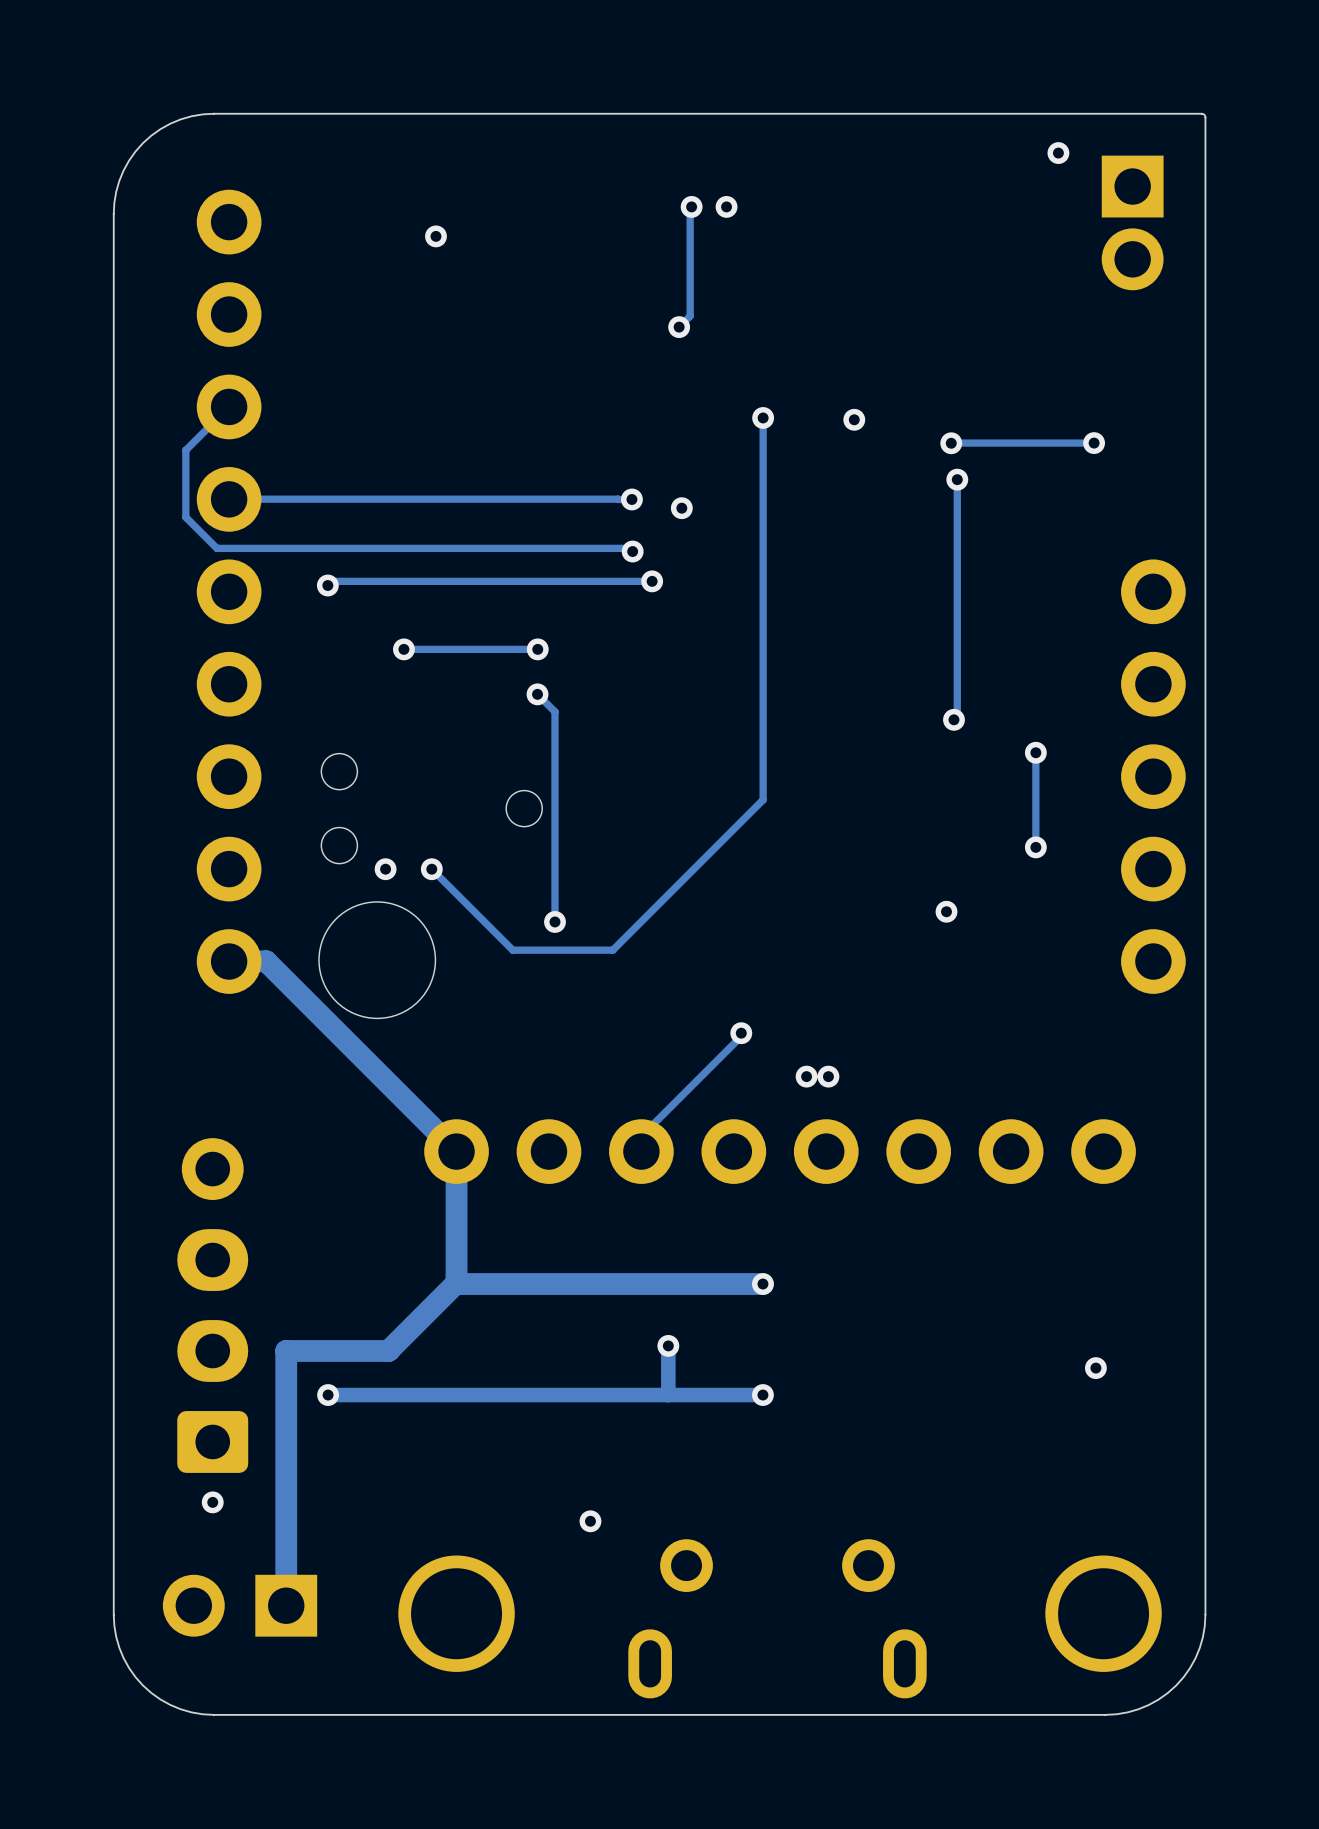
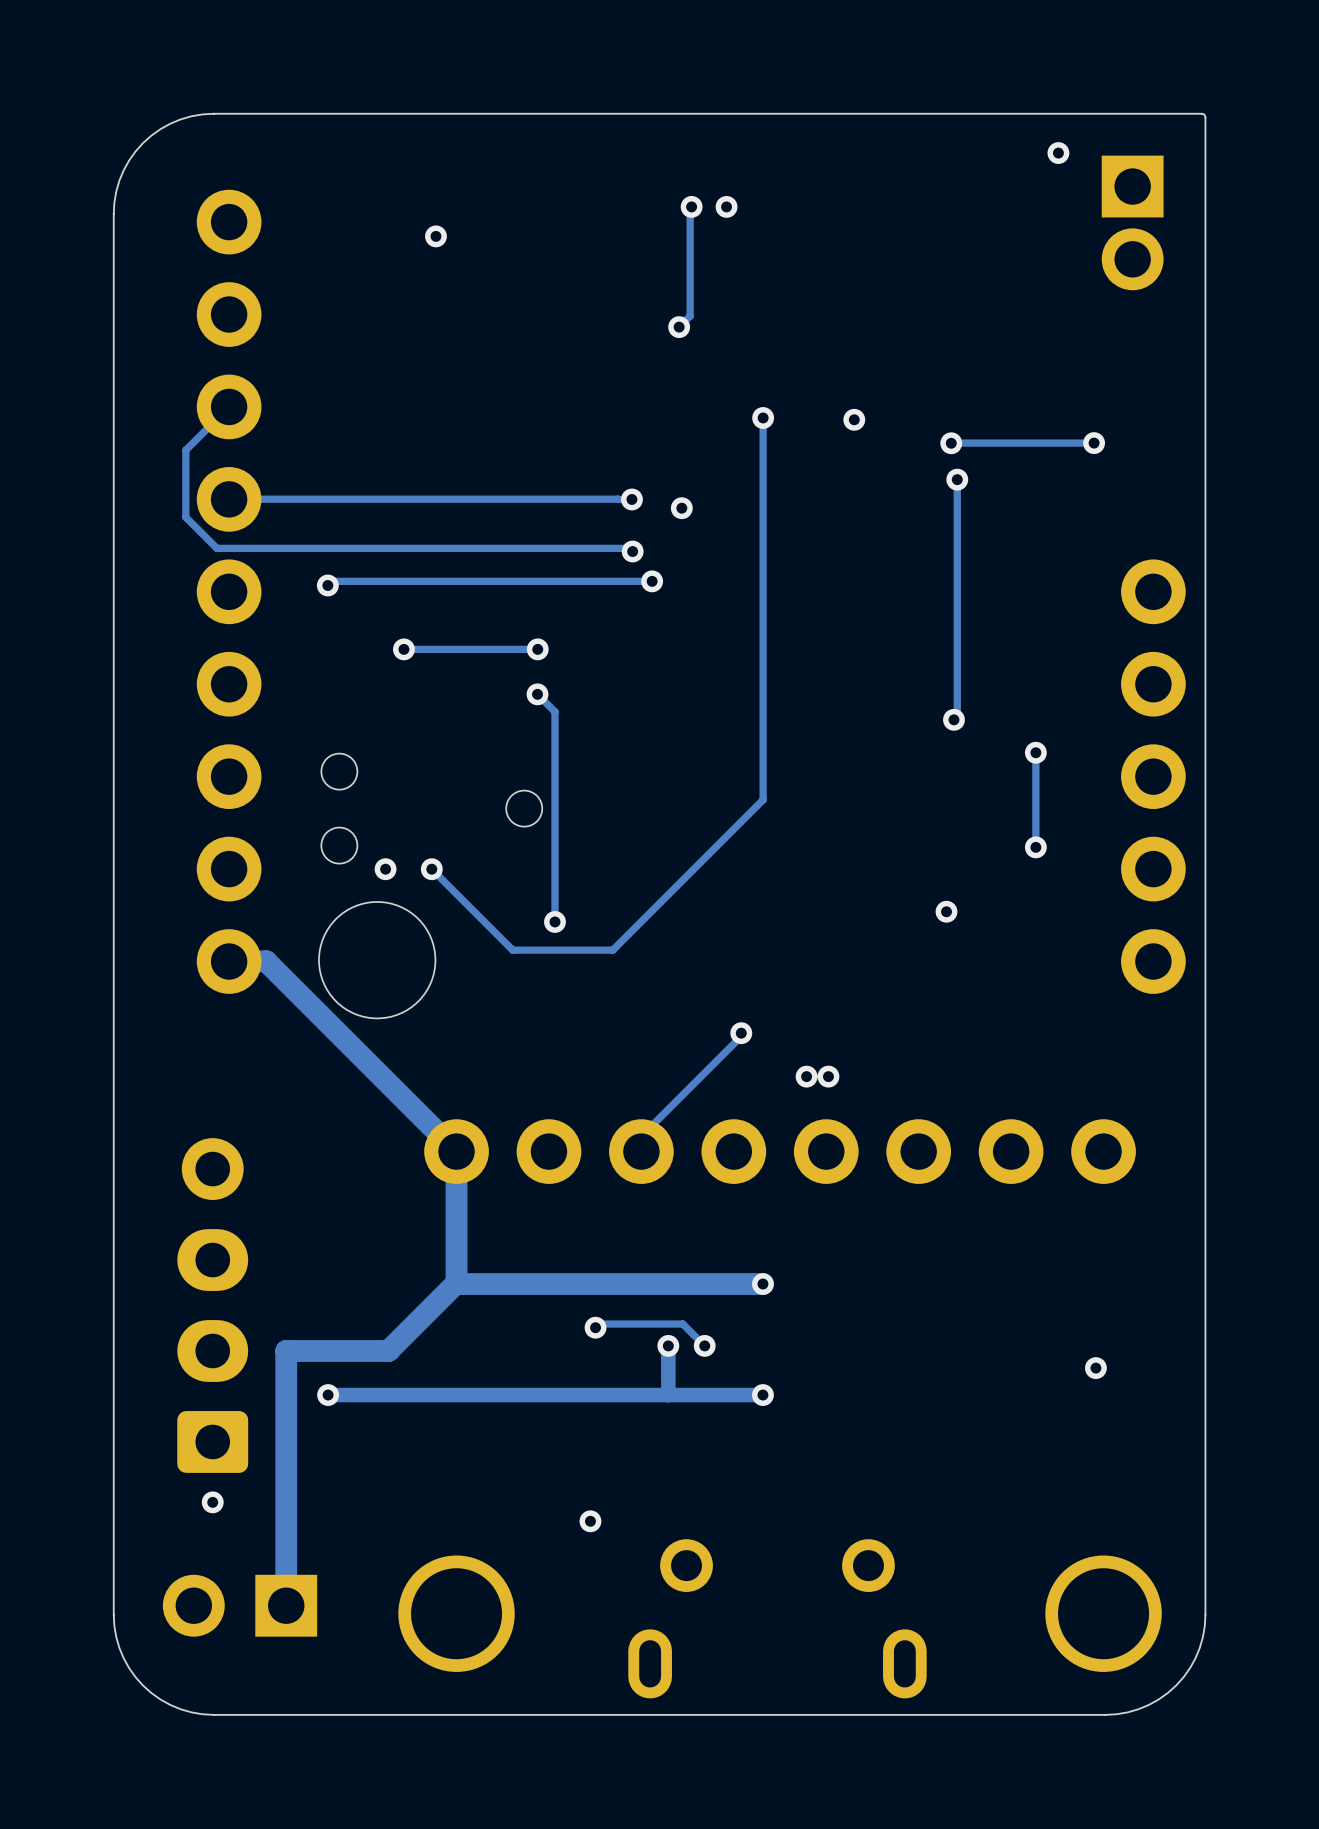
track: none -> (595, 1327) (599, 1324) (682, 1324) (704, 1345)
via: none -> (595, 1327)
via: none -> (704, 1345)

